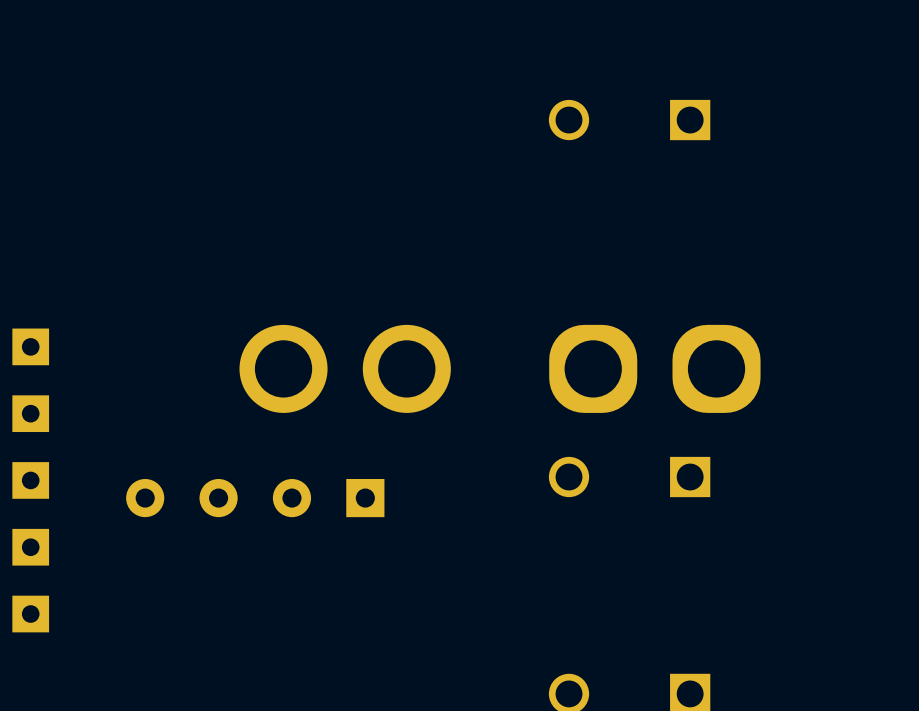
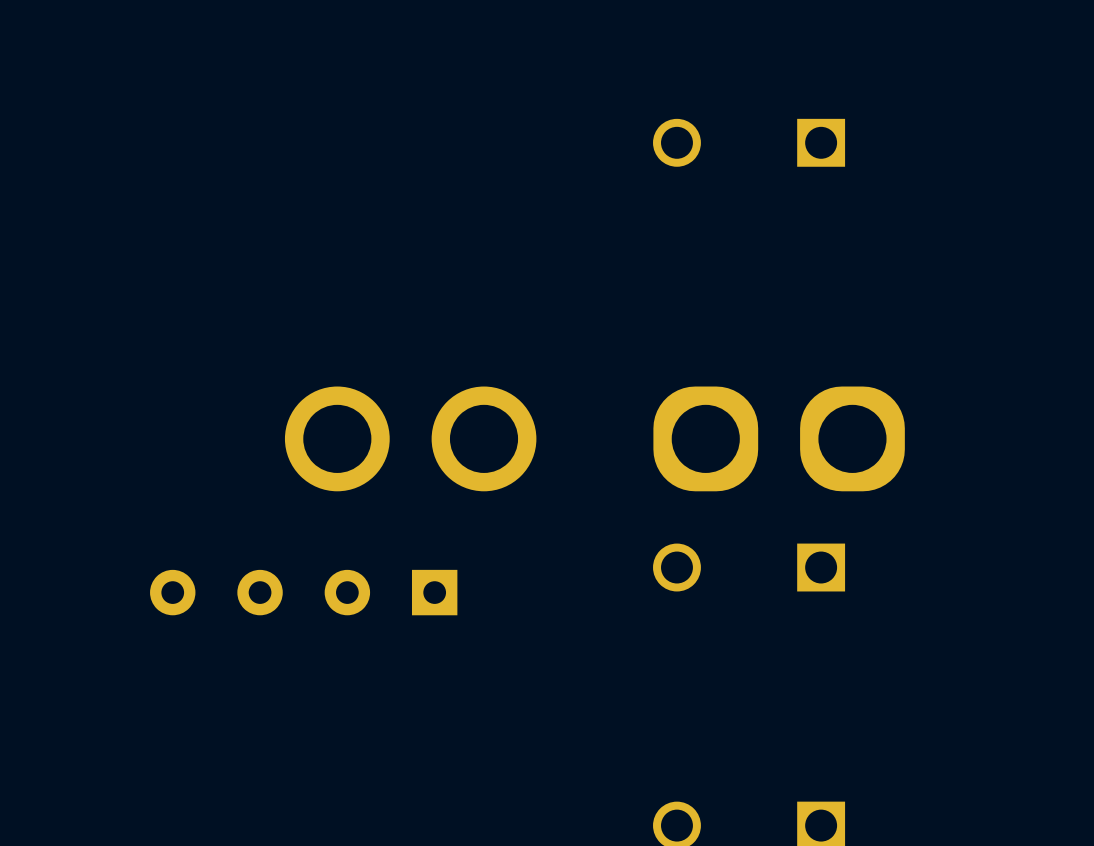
part: (30, 346) -> none
part: (30, 413) -> none
part: (30, 480) -> none
part: (30, 547) -> none
part: (30, 614) -> none

